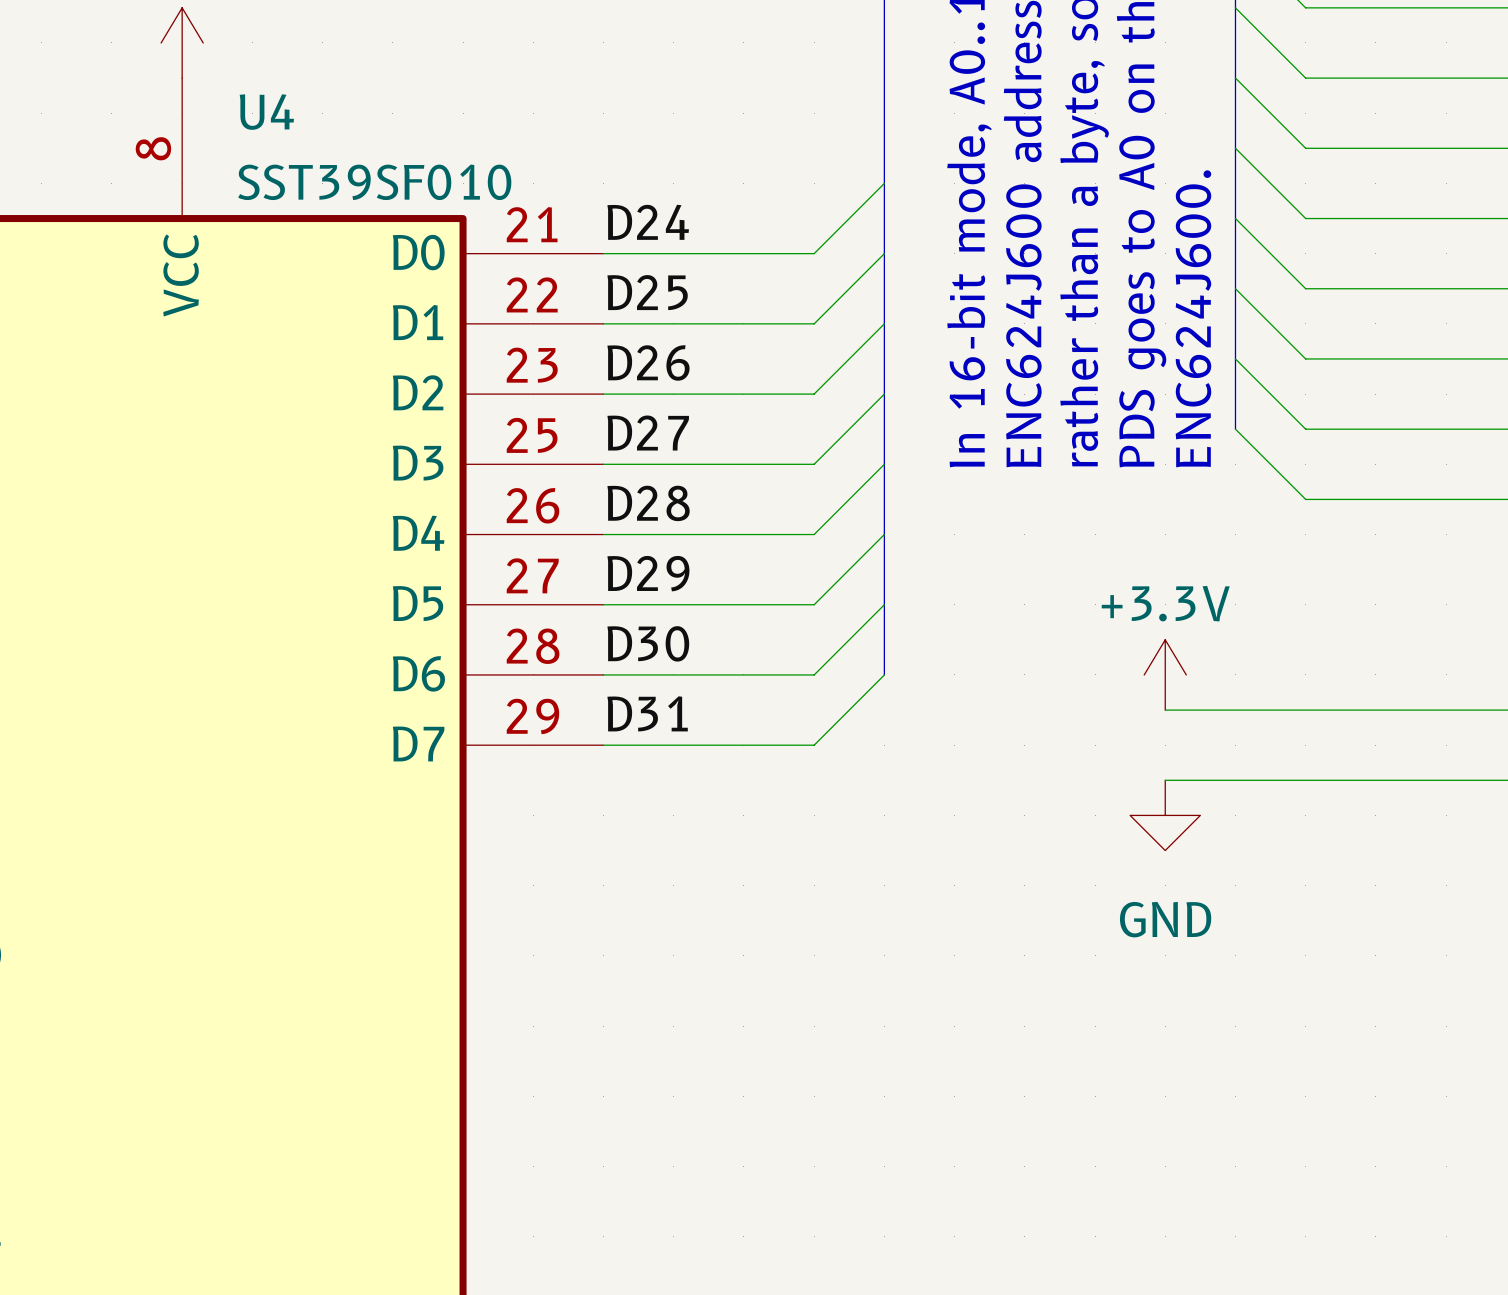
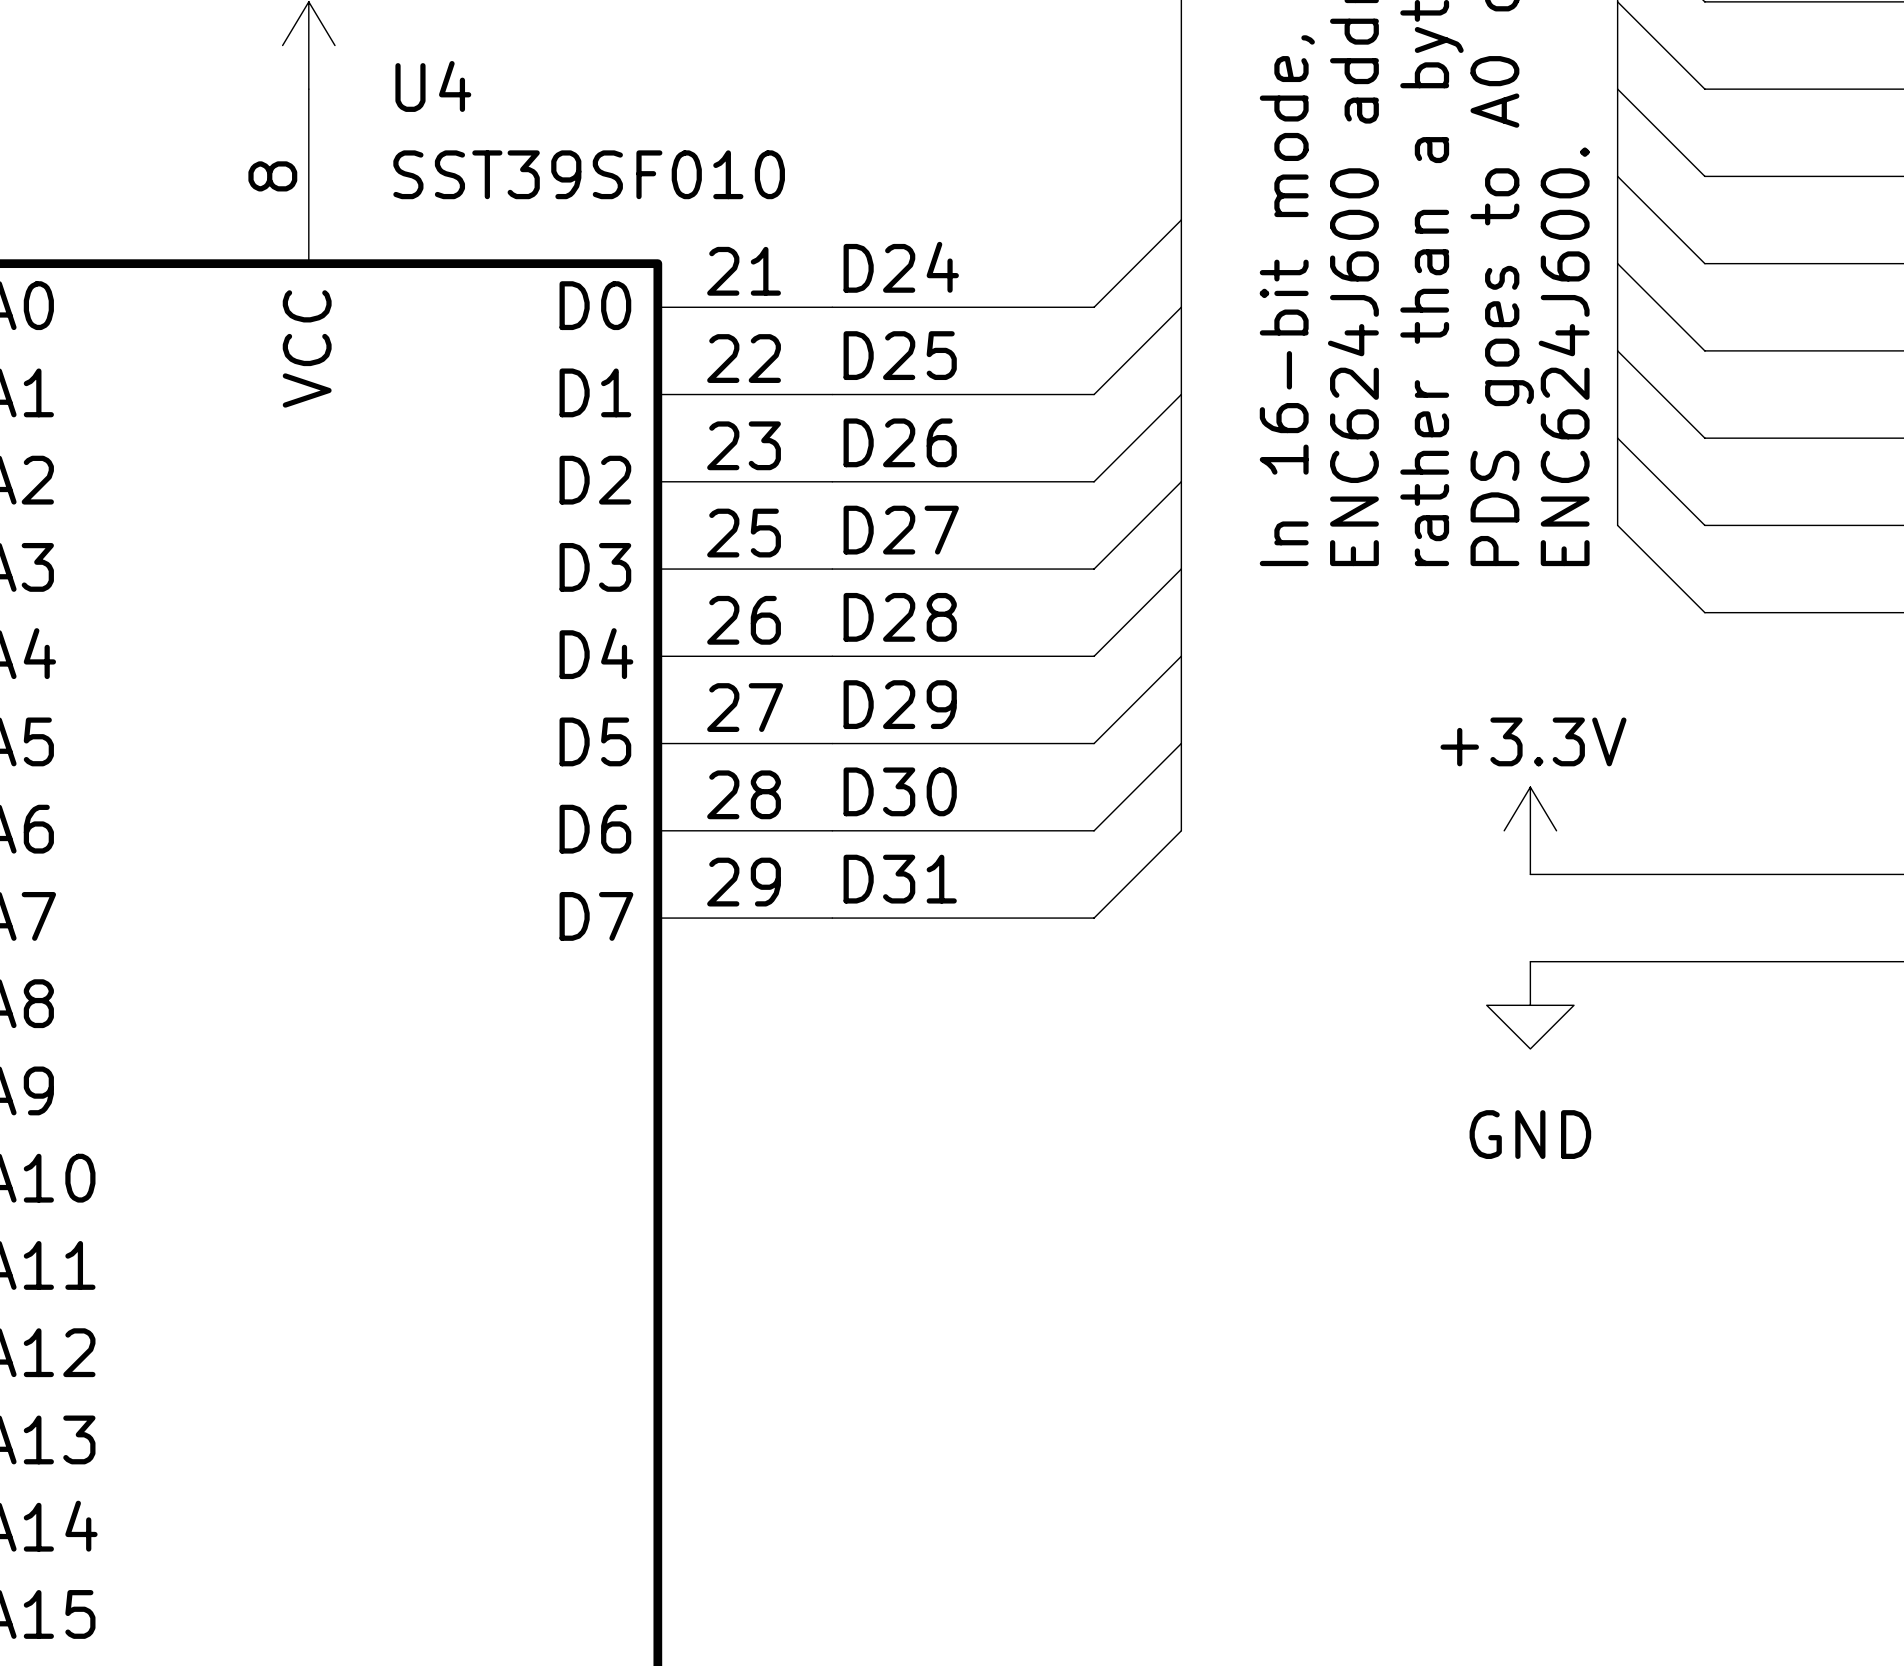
U4 name position: U4 (266, 112) -> U4 (433, 86)
U4 value position: SST39SF010 (374, 182) -> SST39SF010 (589, 174)

